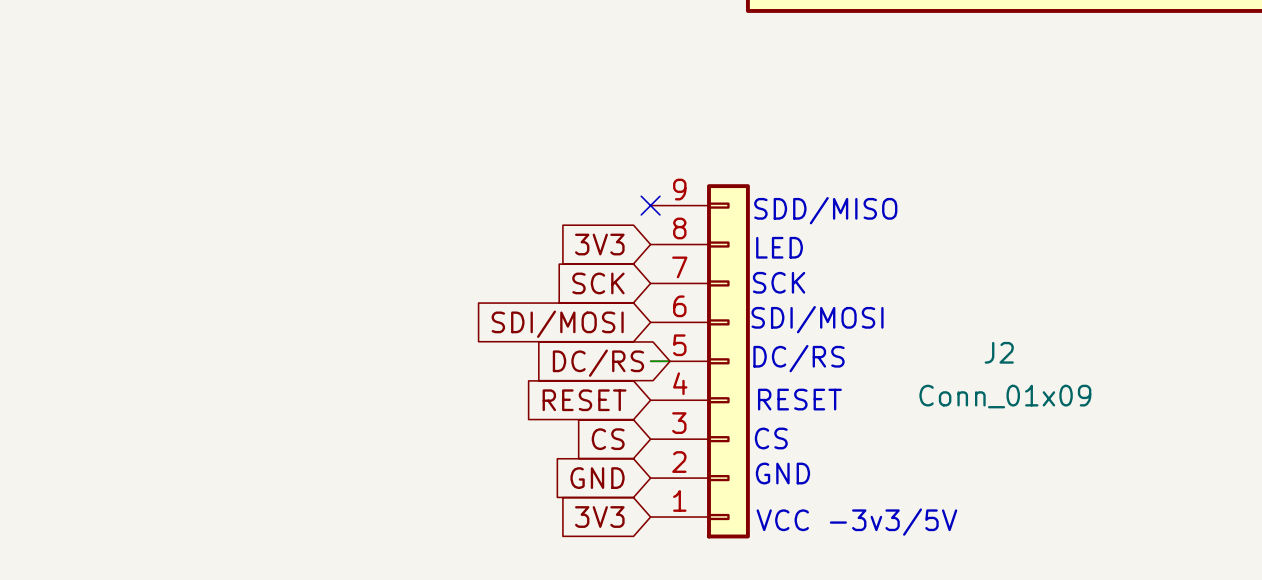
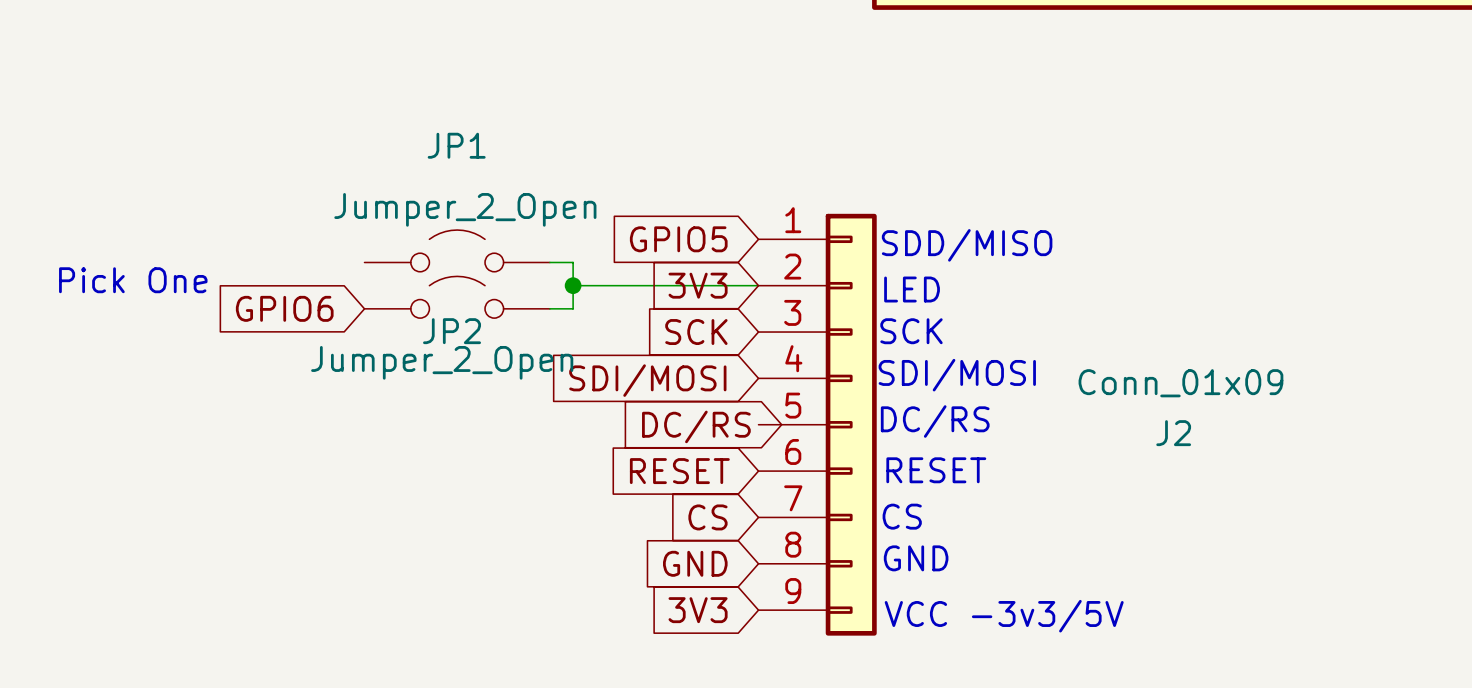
global label: none -> GPIO5 (678, 239)
no-connect mark: (650, 205) -> none
JP1: none -> Jumper_2_Open (457, 250)
wire: none -> (549, 262) (573, 262) (573, 308) (549, 308)
text: none -> Pick One (133, 280)
wire: none -> (573, 285) (758, 285)
junction: none -> (573, 285)
JP2: none -> Jumper_2_Open (457, 297)
global label: none -> GPIO6 (284, 308)
J2 flip: as is (728, 361) -> up-down (851, 424)

